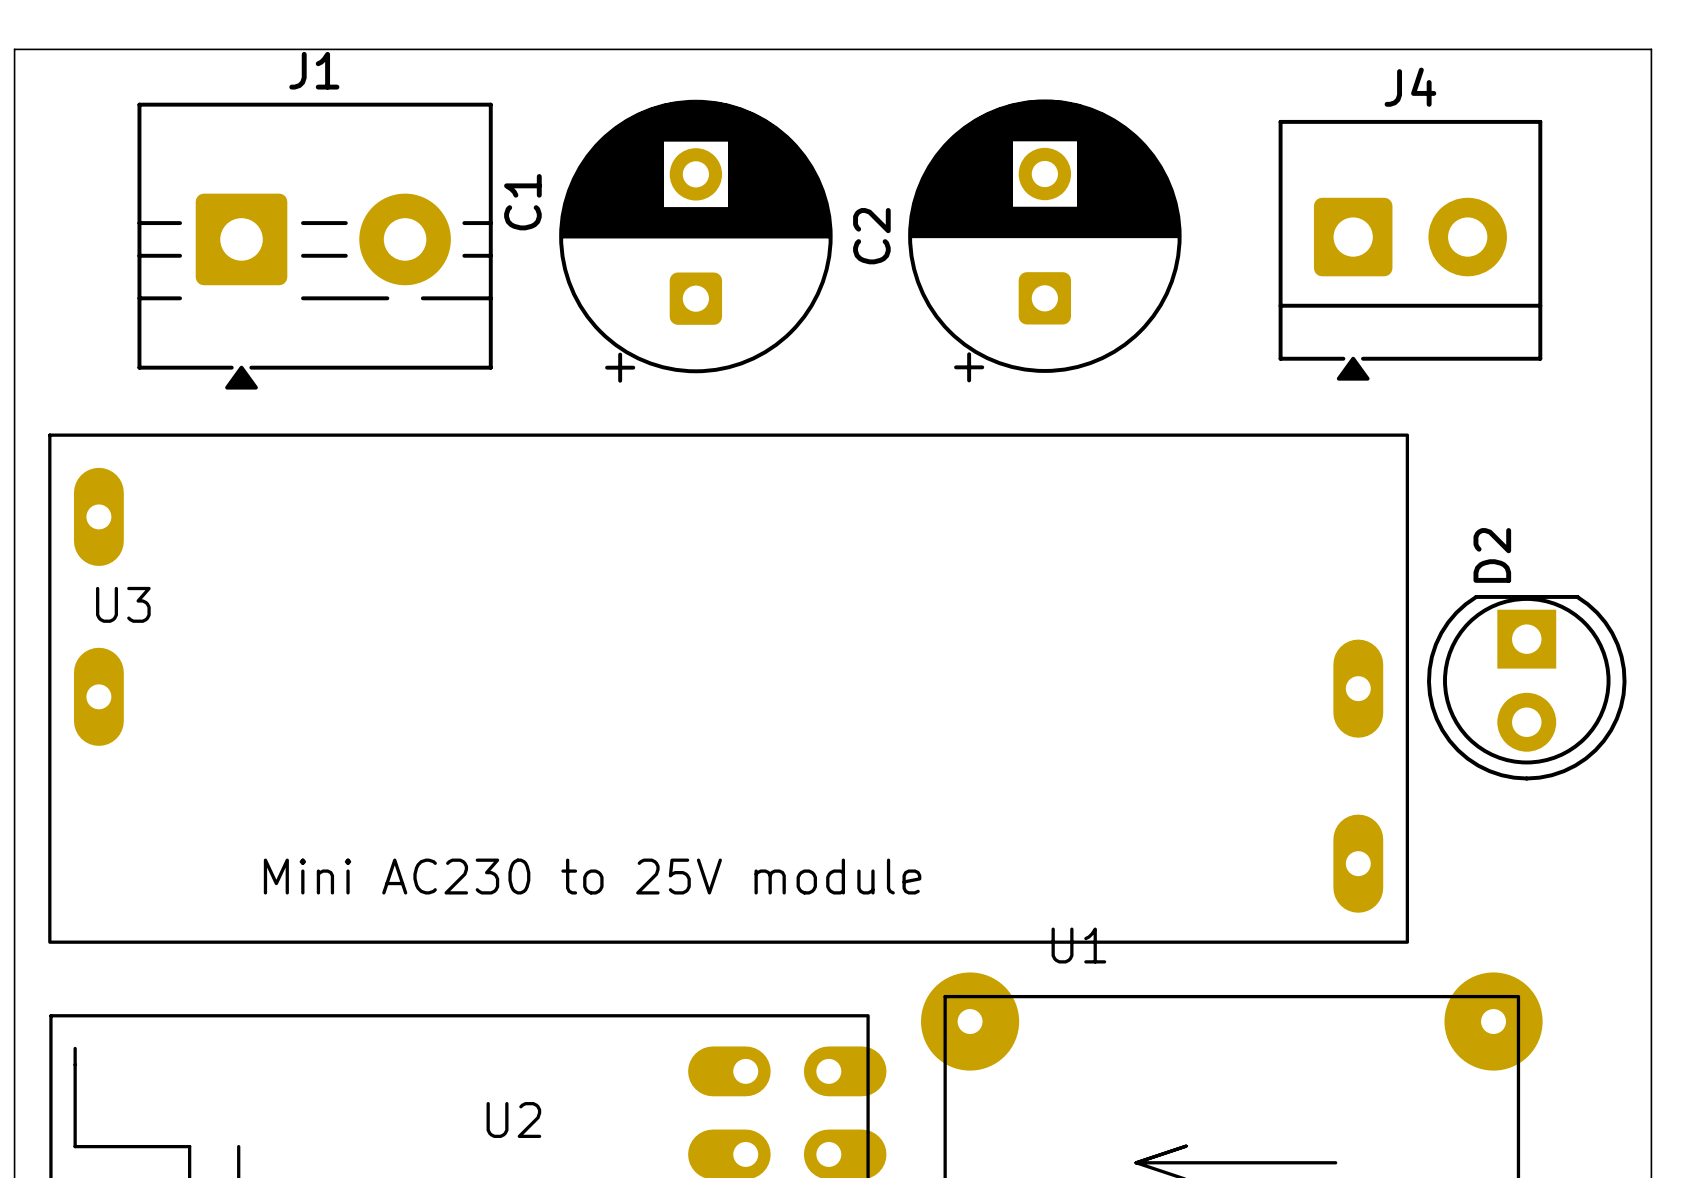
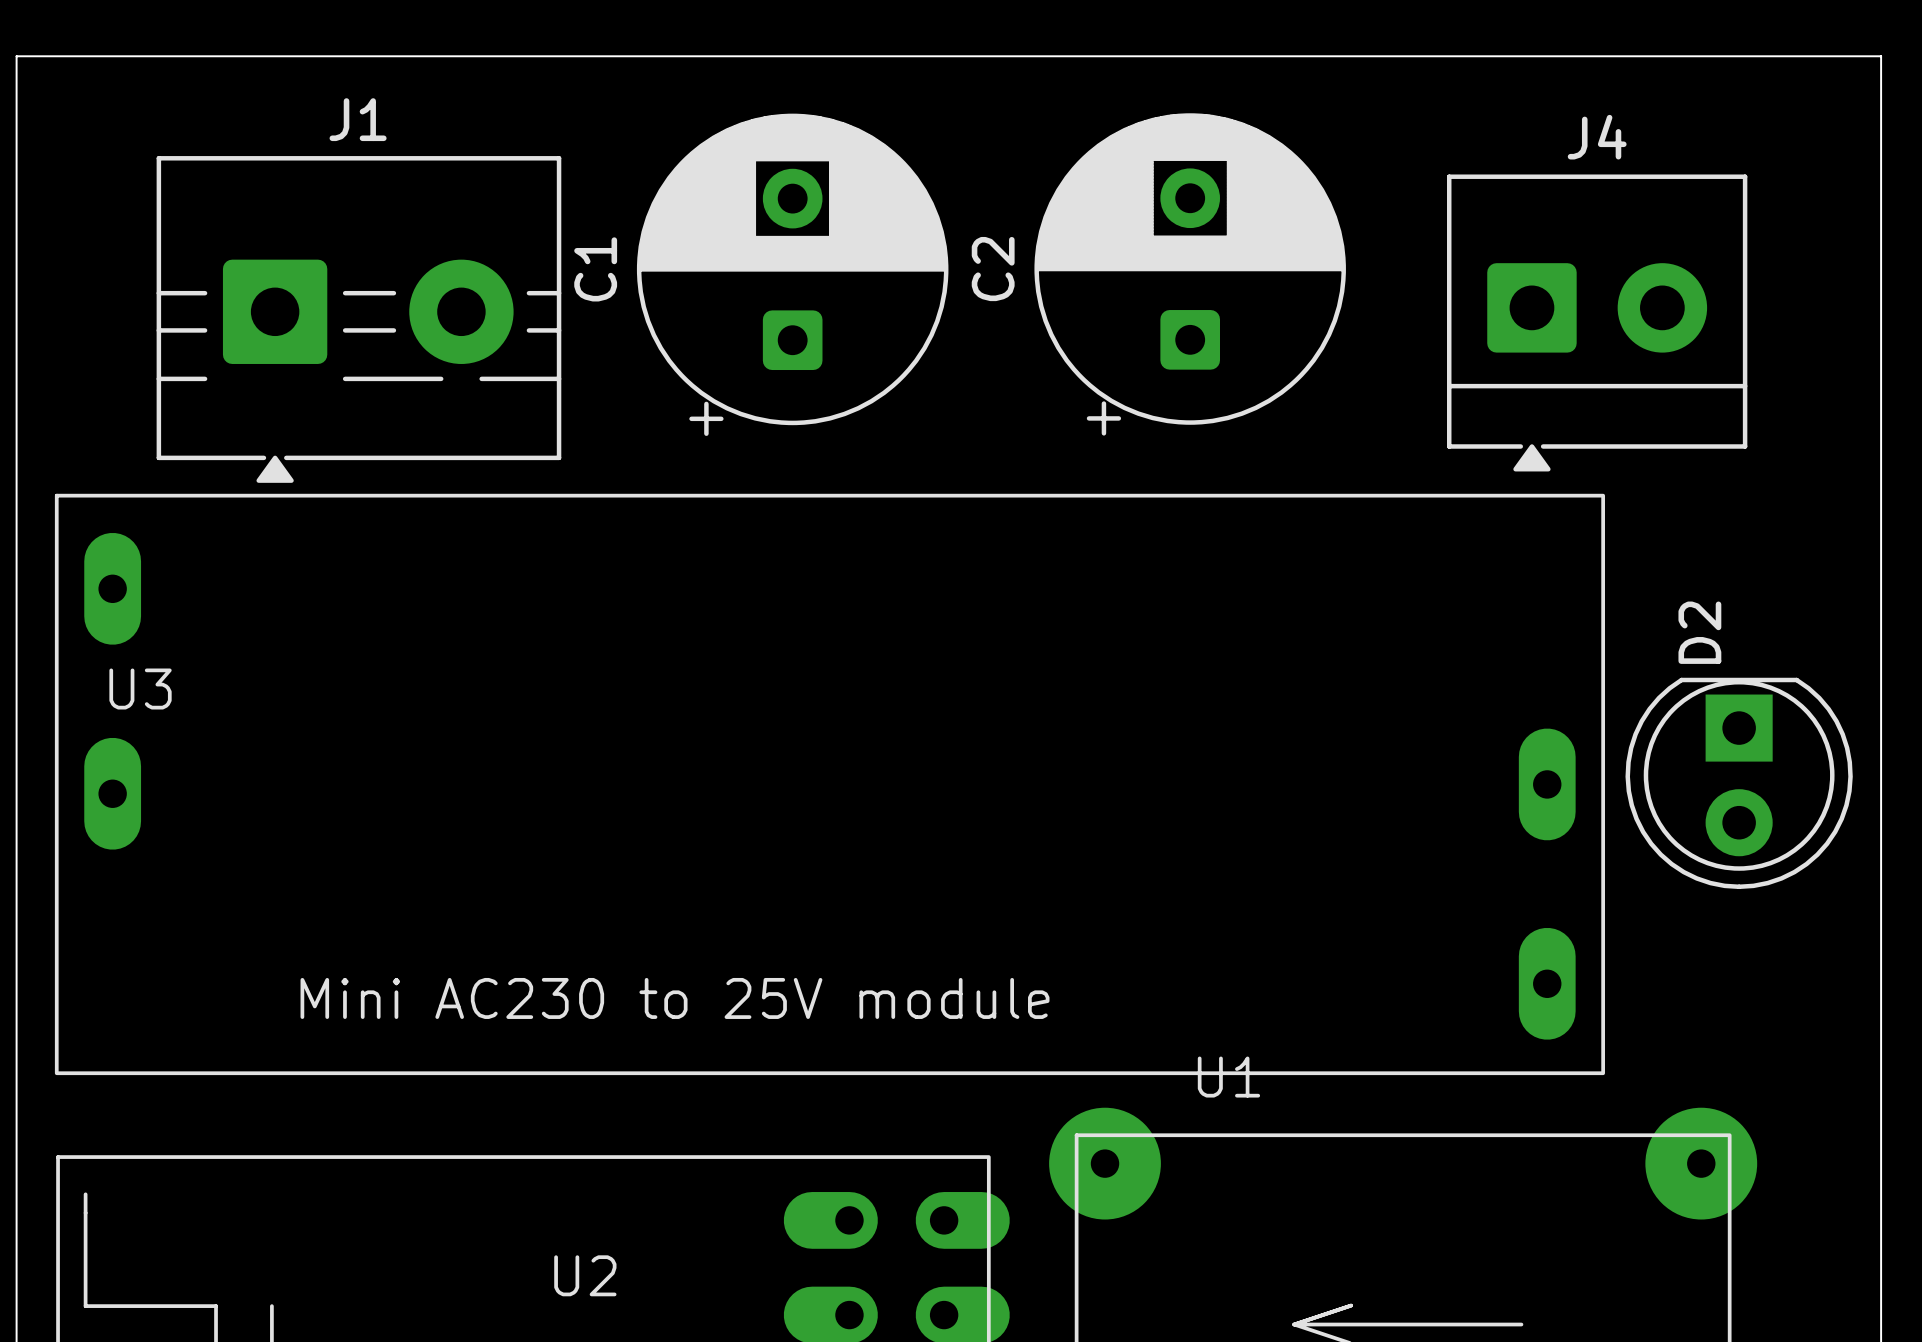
C1 name position: C1 (522, 202) -> C1 (595, 269)
J1 position: (315, 246) -> (358, 319)
J4 position: (1410, 250) -> (1597, 322)

